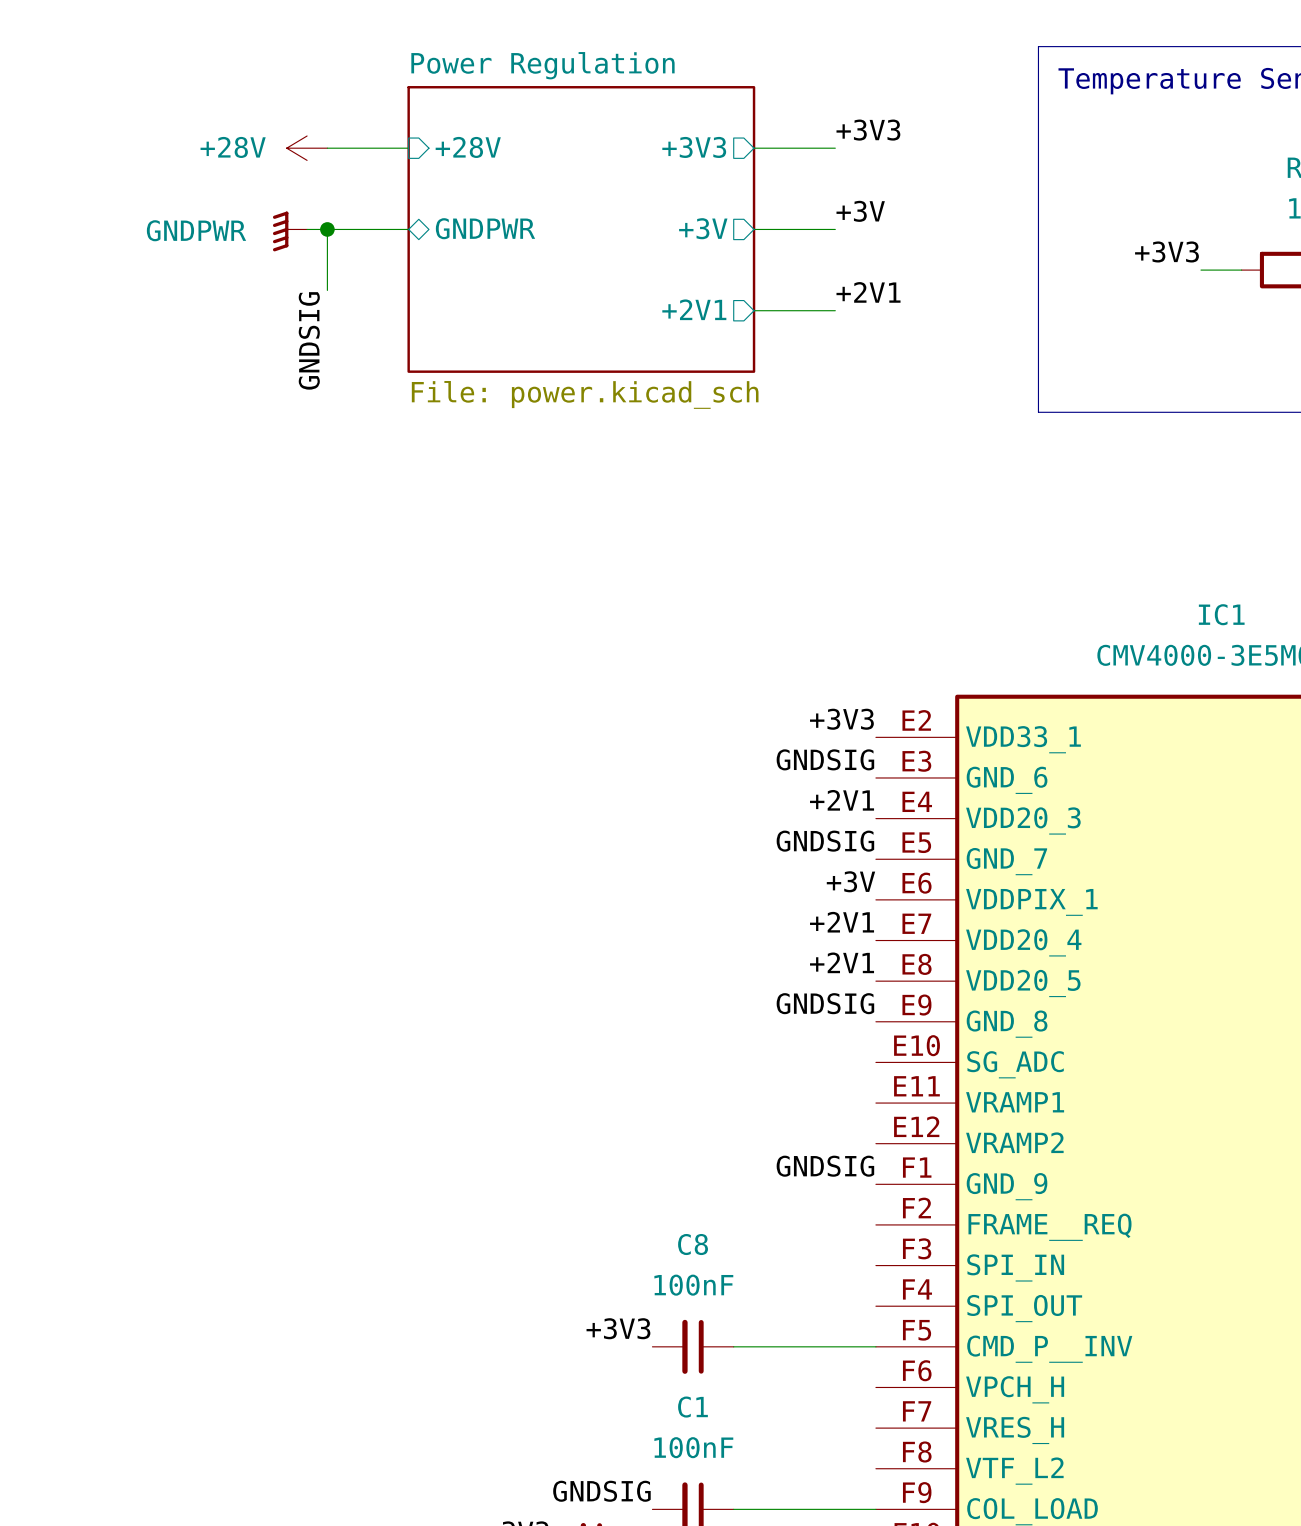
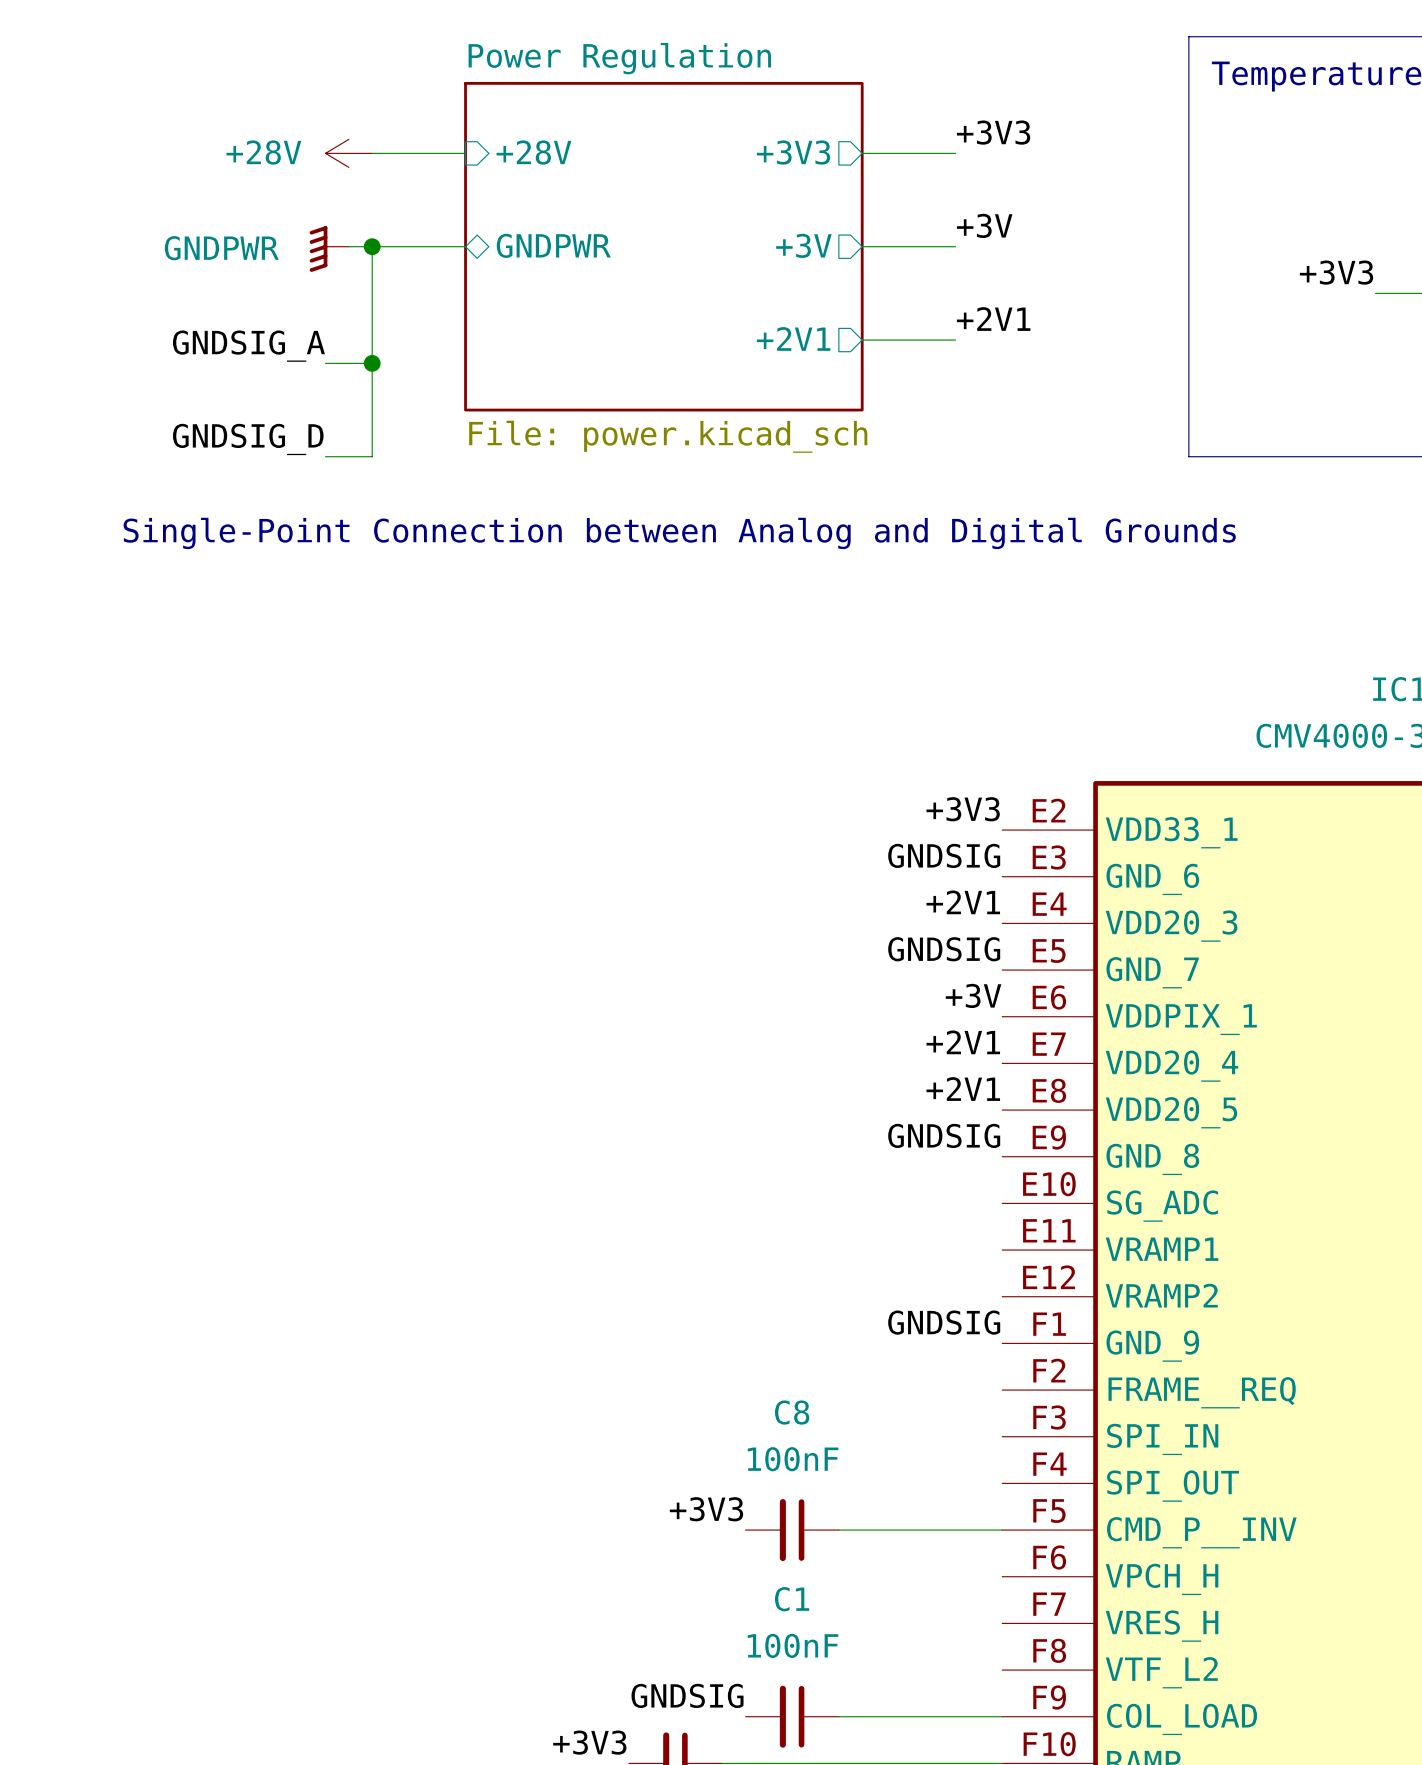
wire: none -> (372, 316) (372, 456) (325, 456)
label: none -> GNDSIG_A (248, 346)
wire: none -> (325, 363) (372, 363)
junction: none -> (372, 363)
label: GNDSIG (309, 340) -> none
label: none -> GNDSIG_D (248, 439)
text: none -> Single-Point Connection between Analog and Digital Grounds (679, 533)

